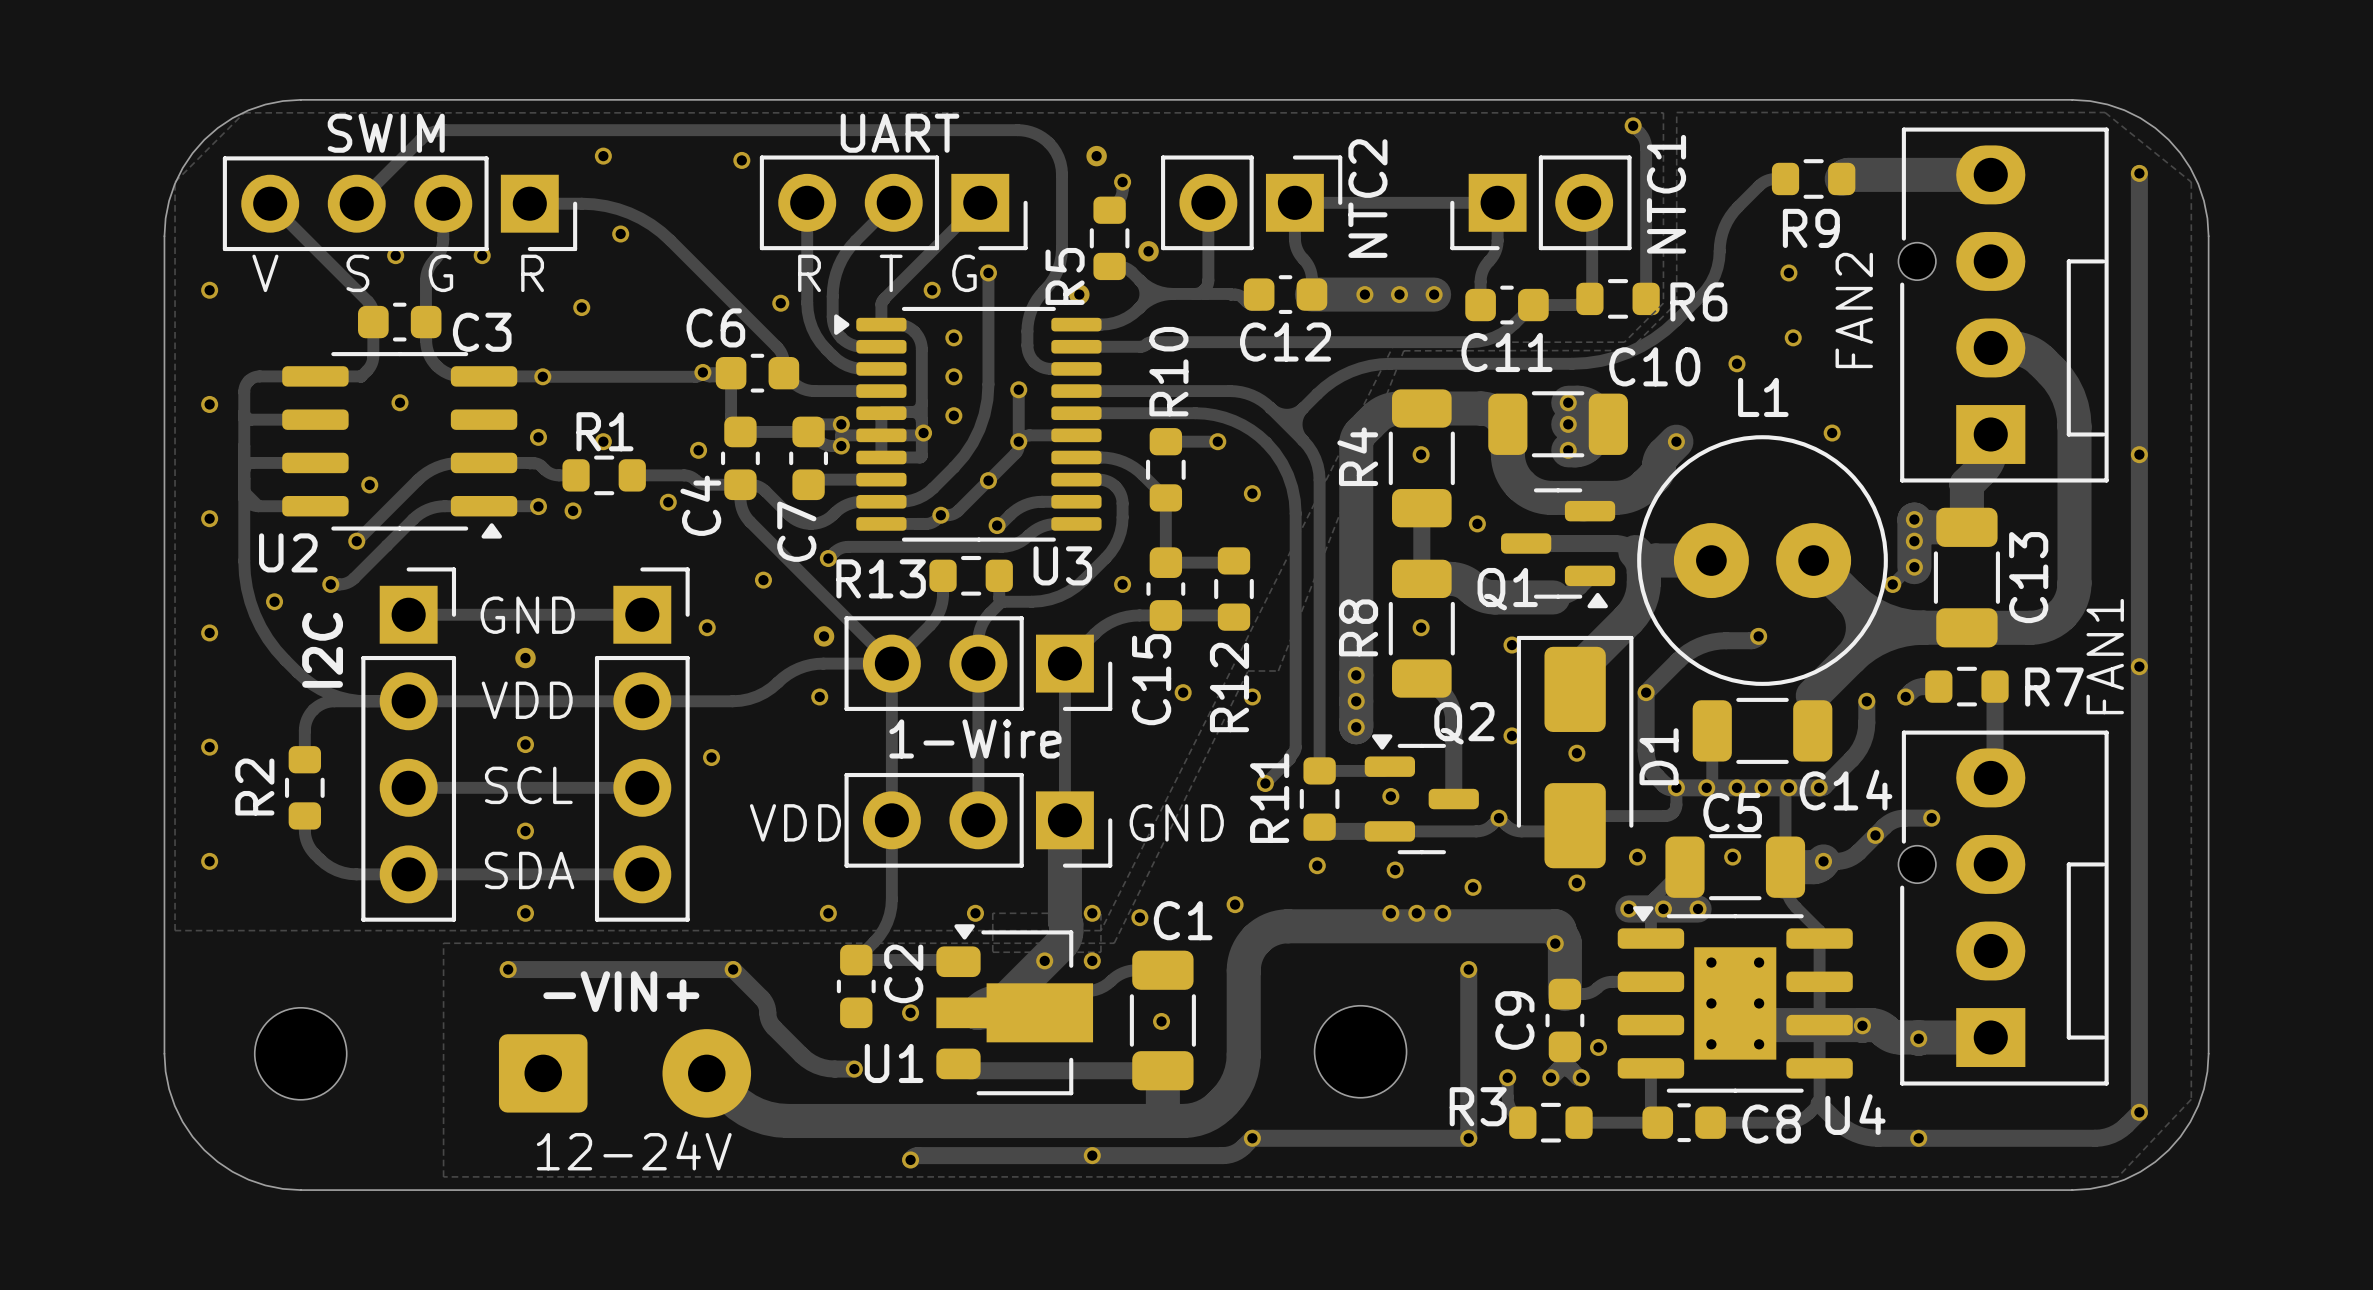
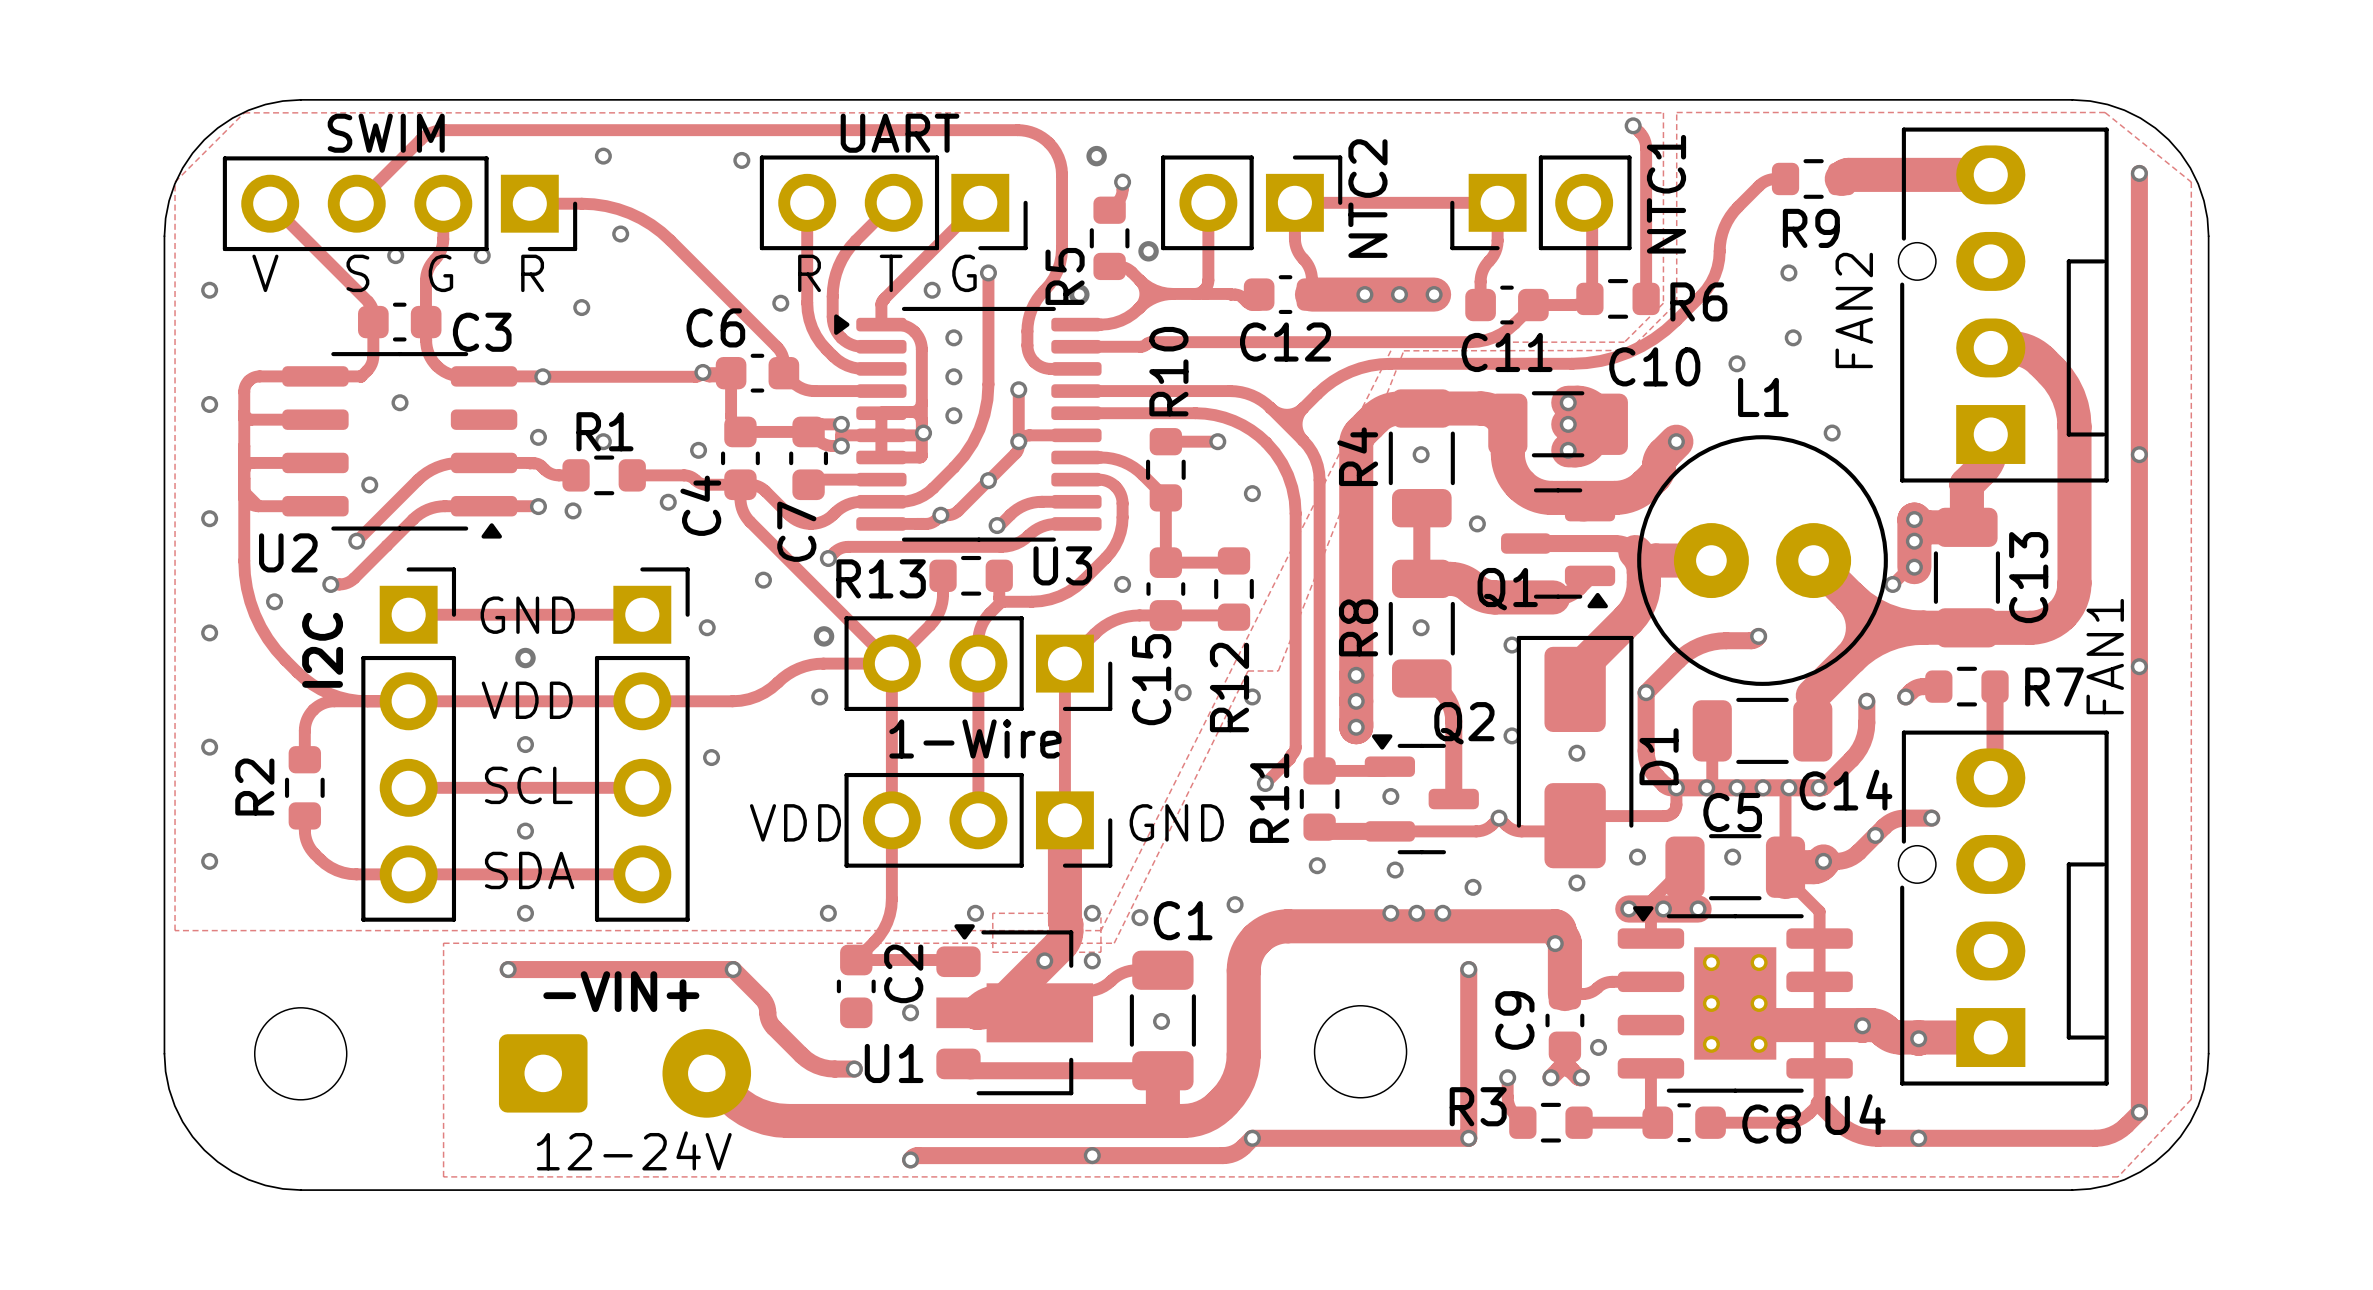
track: (1785, 882) (1786, 891) (1792, 903) (1819, 930) -> (1785, 882) (1790, 882) (1819, 911) (1819, 930)

